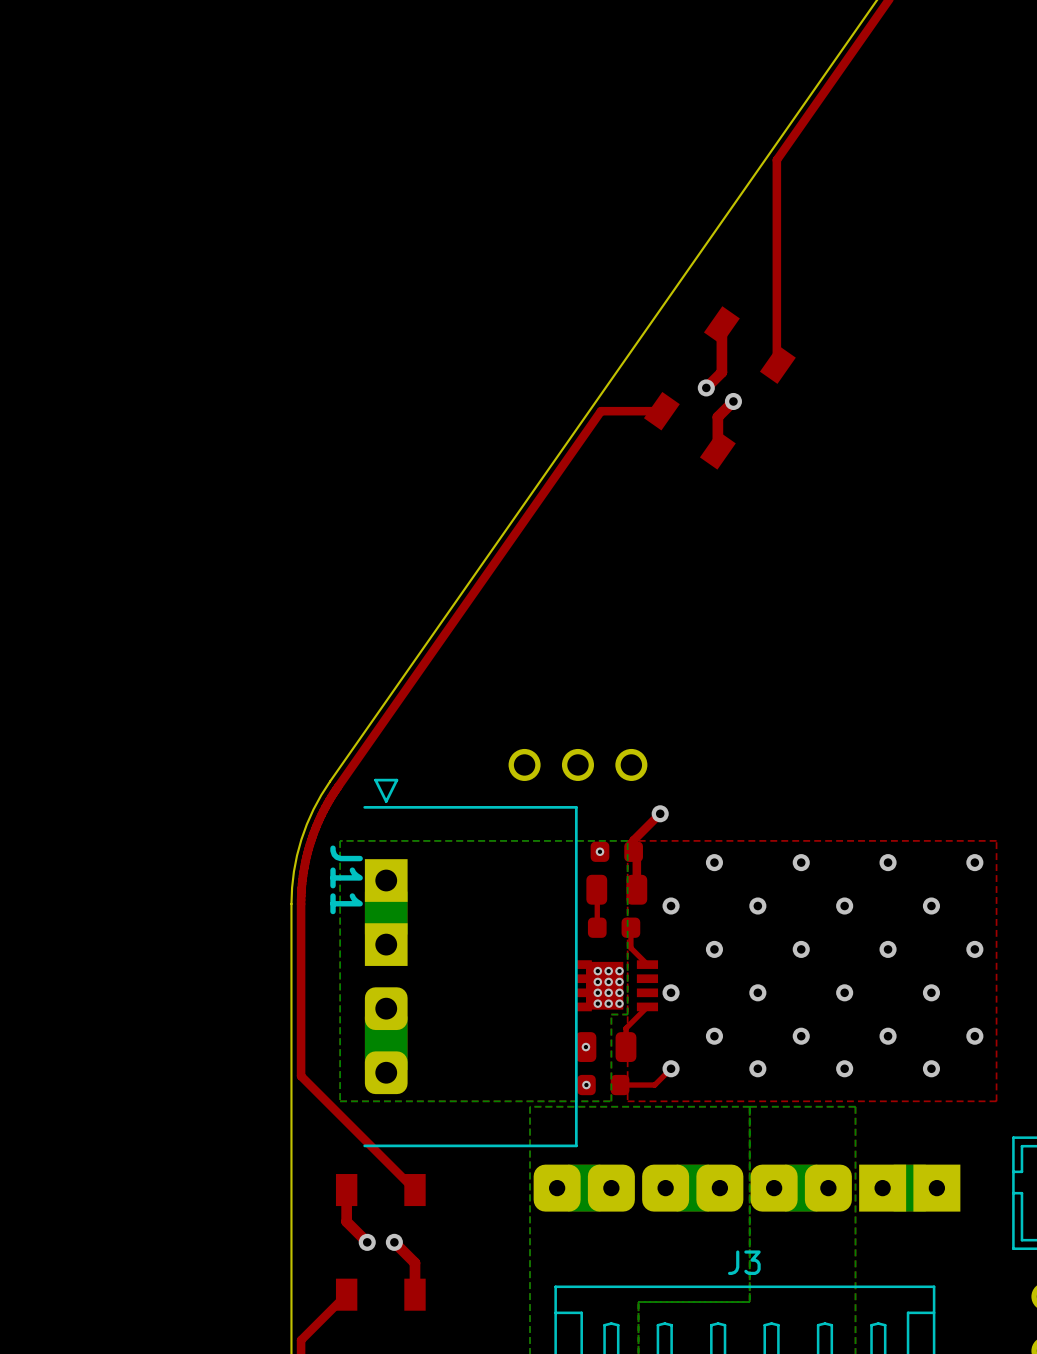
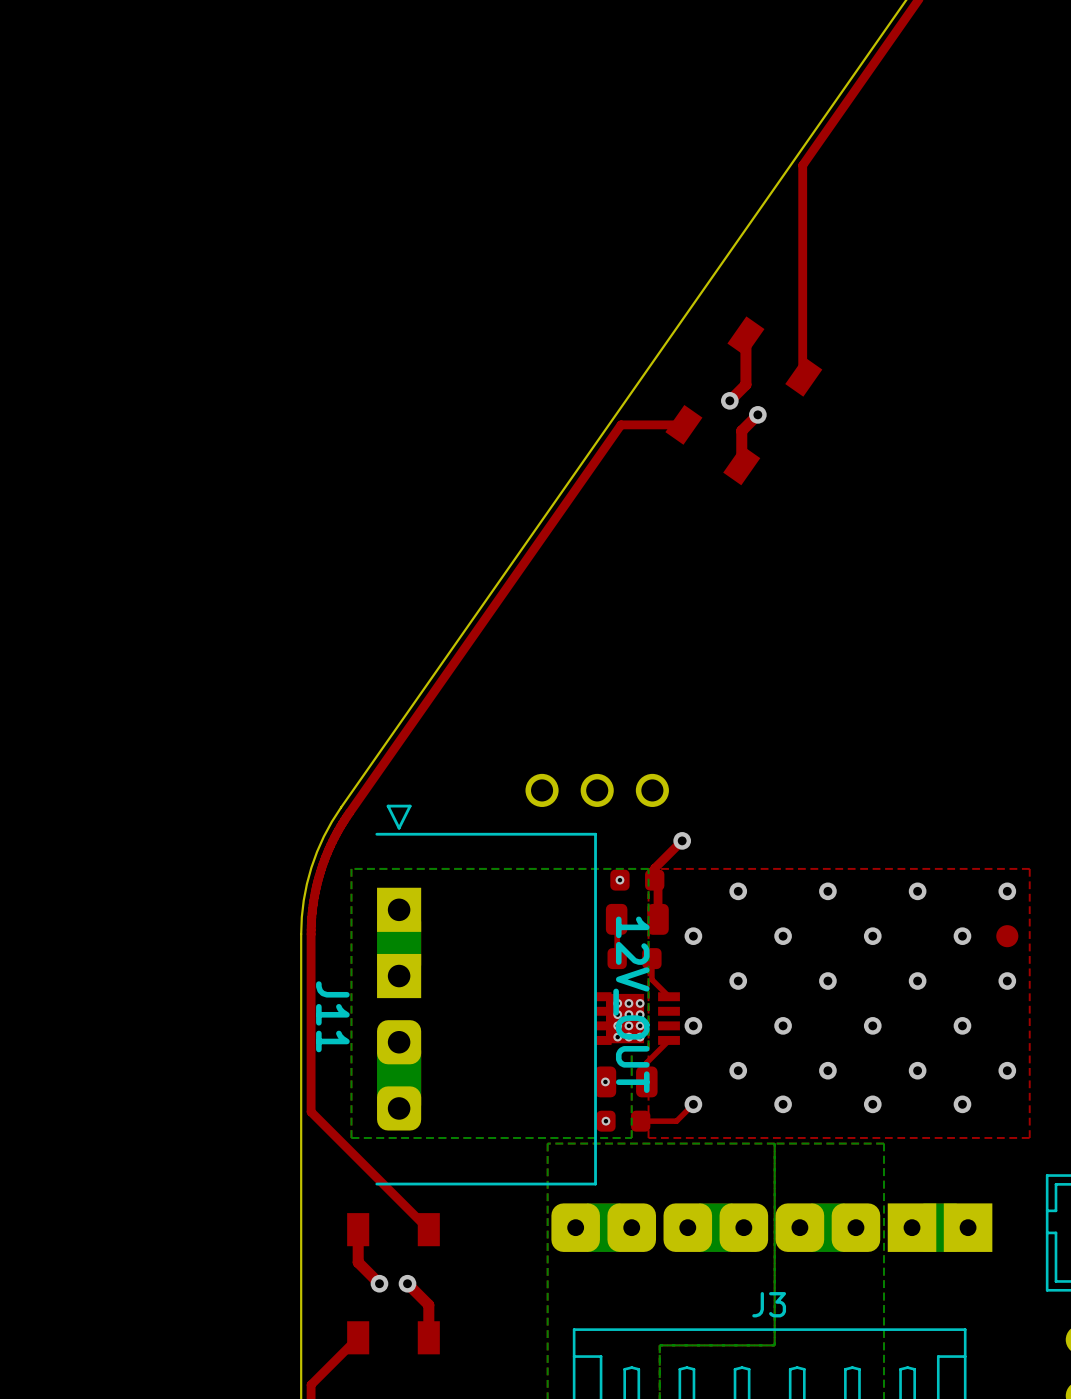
J11 name position: J11 (346, 879) -> J11 (332, 1016)
part: none -> (1007, 936)
J11 value: none -> 12V_OUT (631, 1004)

